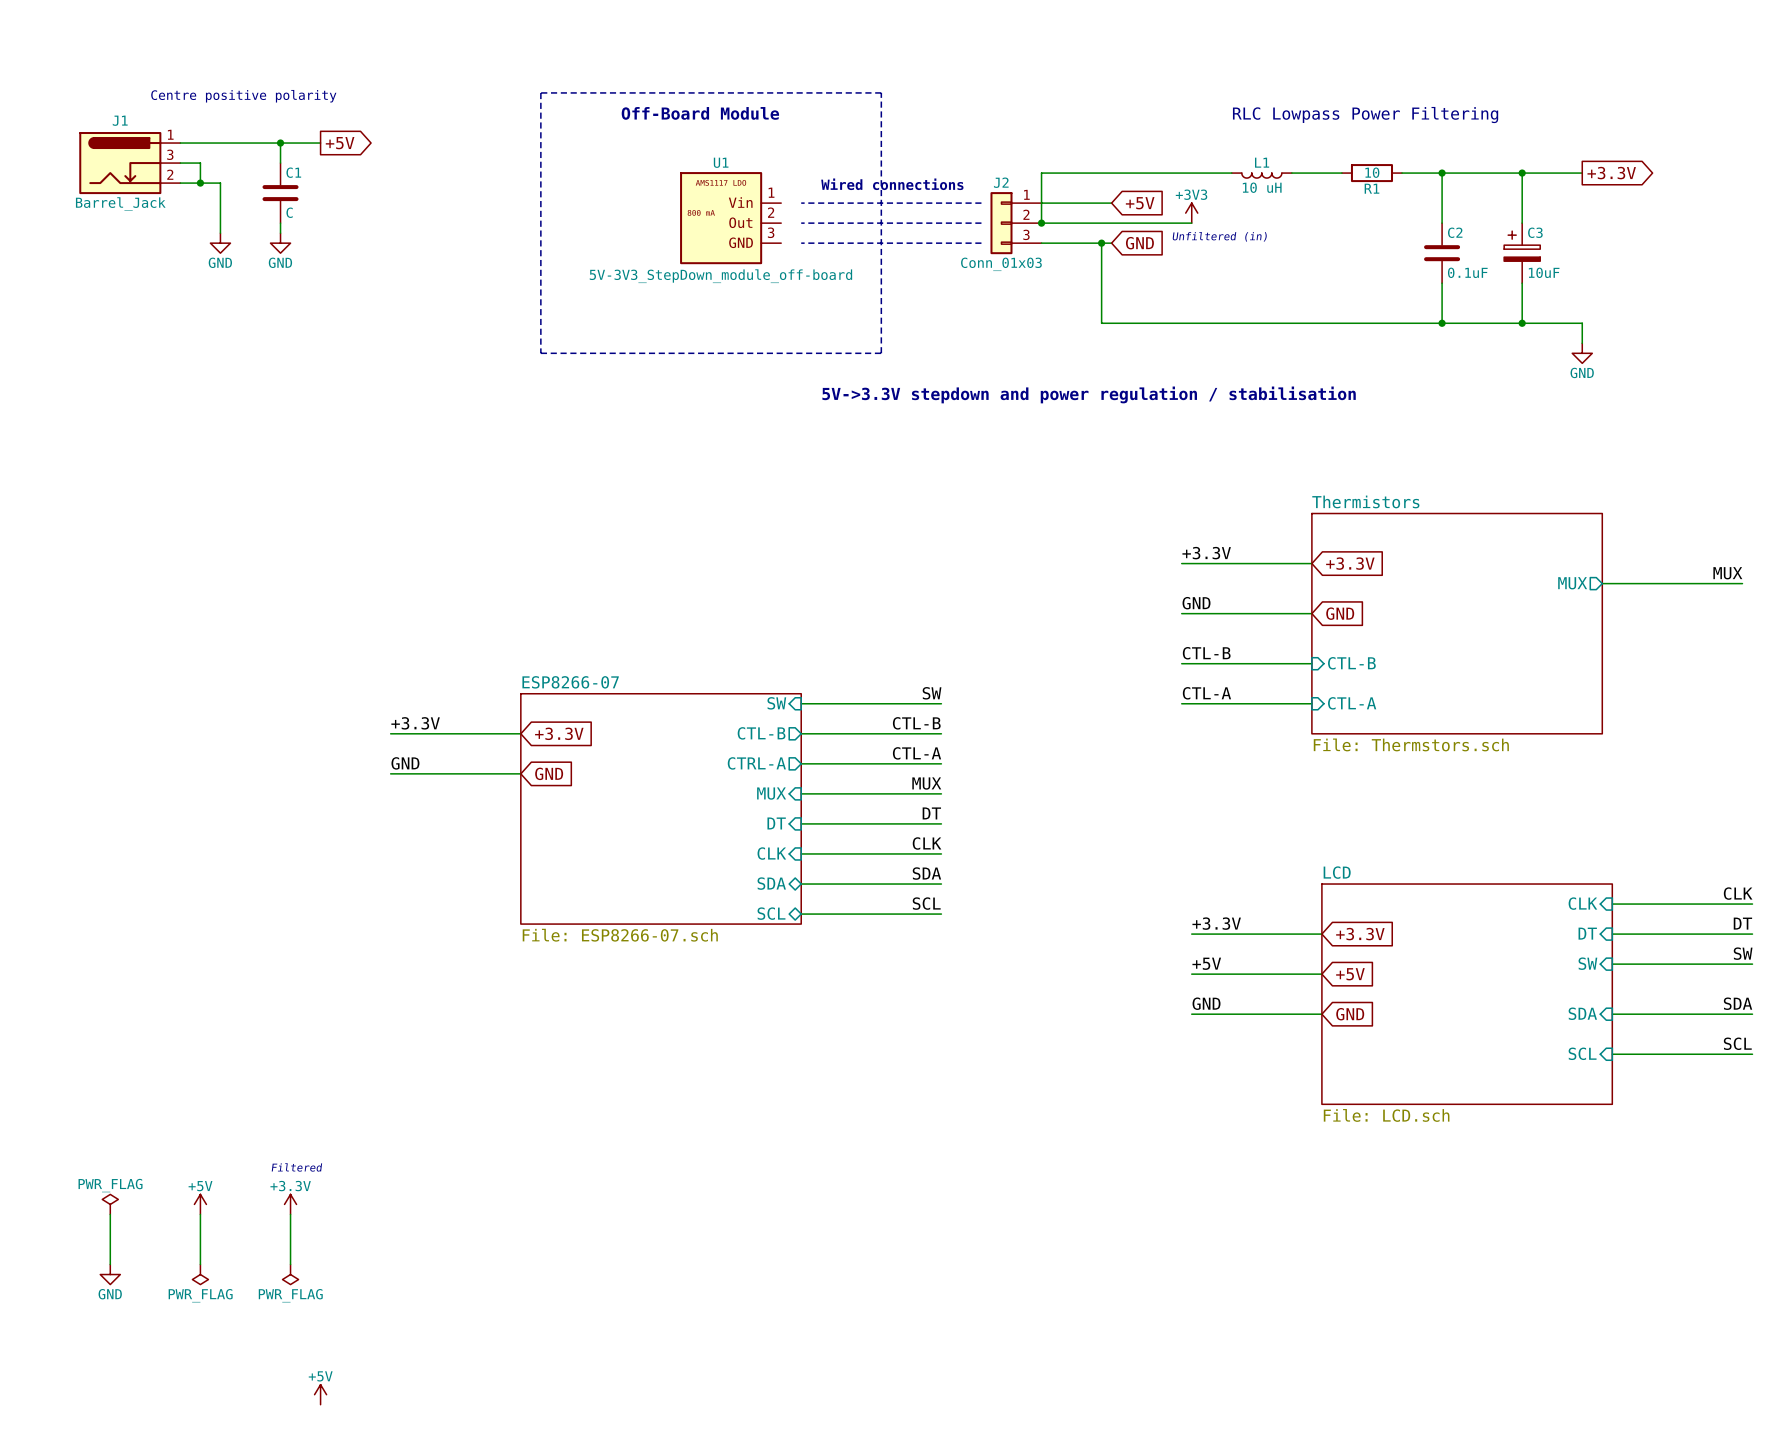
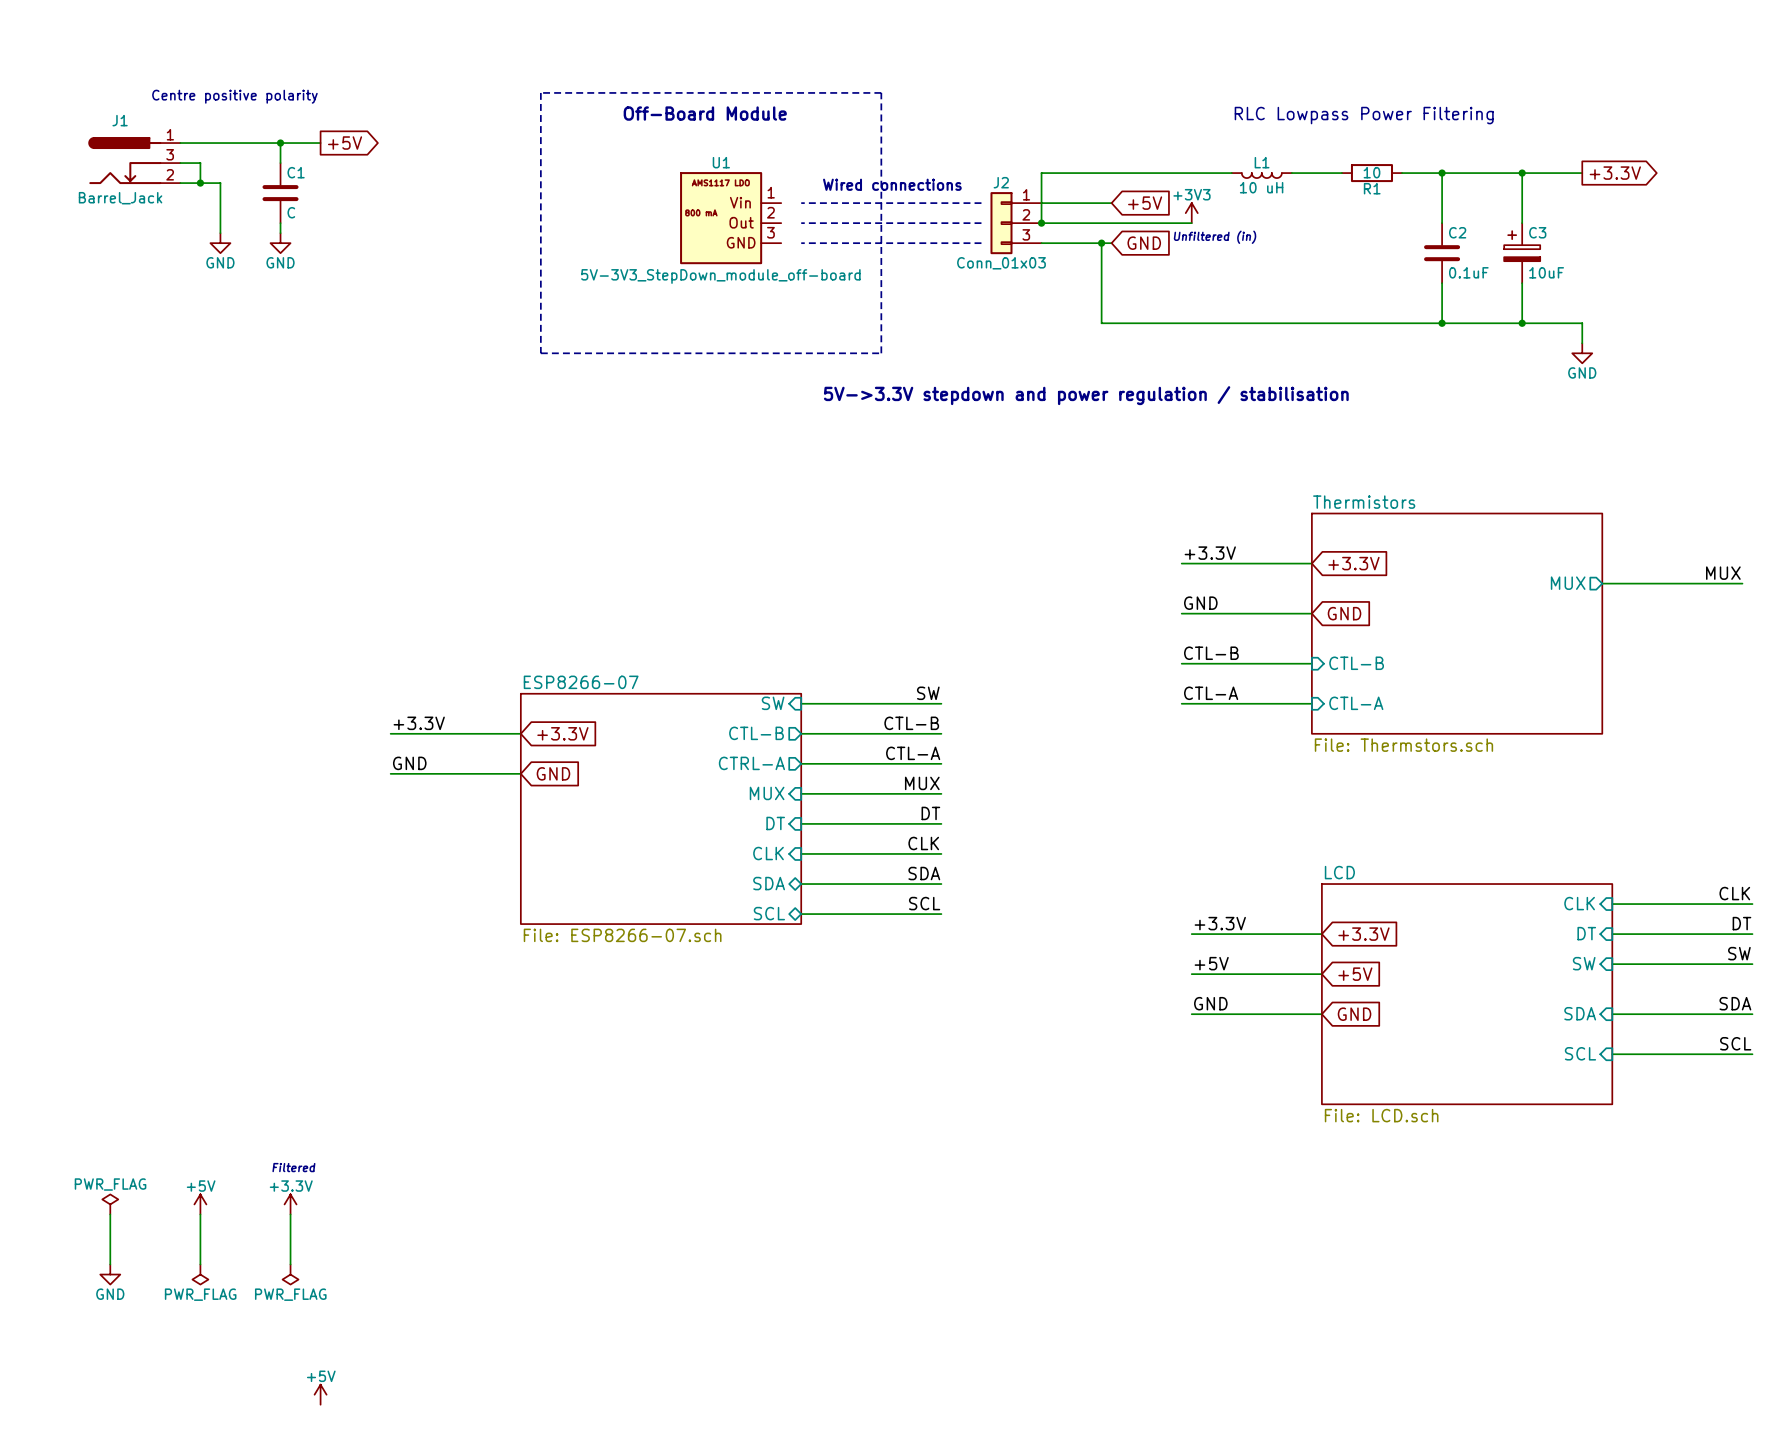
J1 symbol: [79, 132, 181, 195] -> [88, 137, 181, 185]

